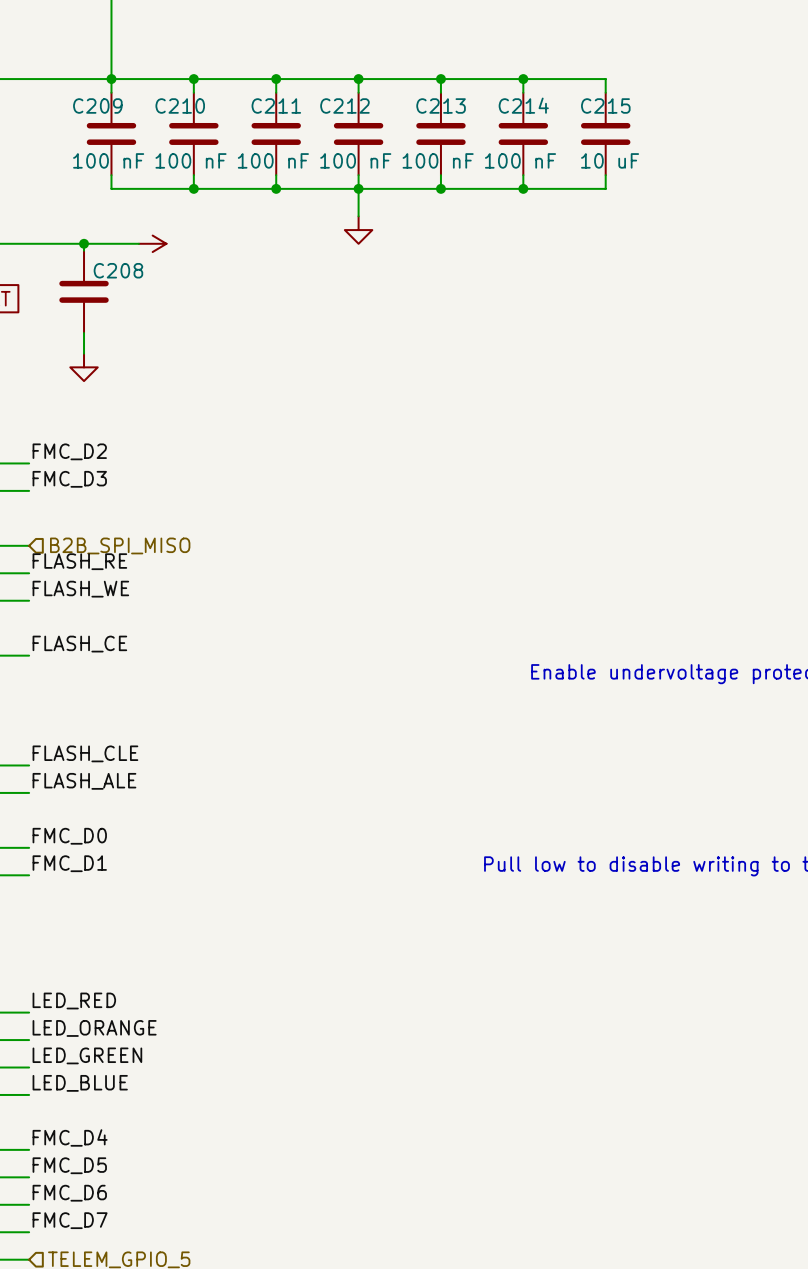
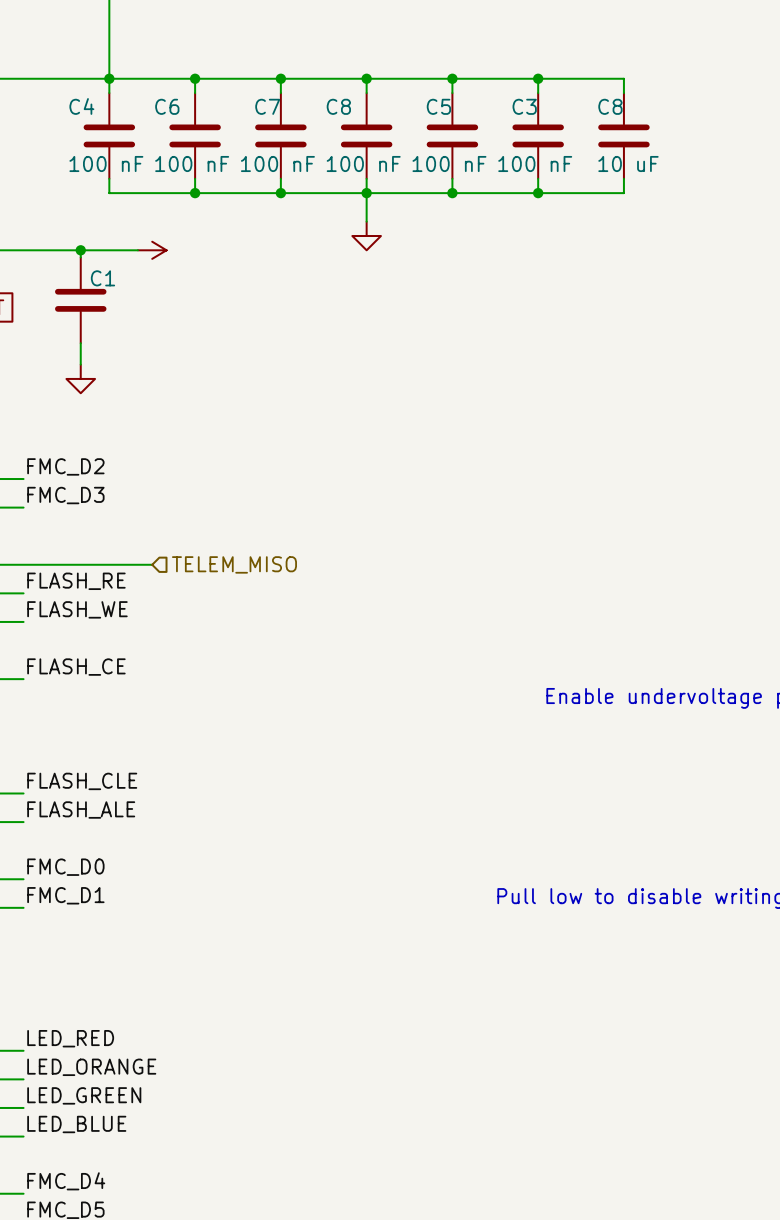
C209 name: C209 (97, 105) -> C4 (81, 106)
C210 name: C210 (180, 105) -> C6 (167, 106)
C211 name: C211 (276, 105) -> C7 (267, 106)
C212 name: C212 (344, 105) -> C8 (338, 106)
C213 name: C213 (441, 105) -> C5 (438, 106)
C214 name: C214 (523, 105) -> C3 (524, 106)
C215 name: C215 (605, 105) -> C8 (610, 106)
C208 name: C208 (118, 270) -> C1 (102, 278)
wire: none -> (23, 564) (152, 564)
hierarchical label: B2B_SPI_MISO (120, 545) -> none
hierarchical label: none -> TELEM_MISO (234, 564)

